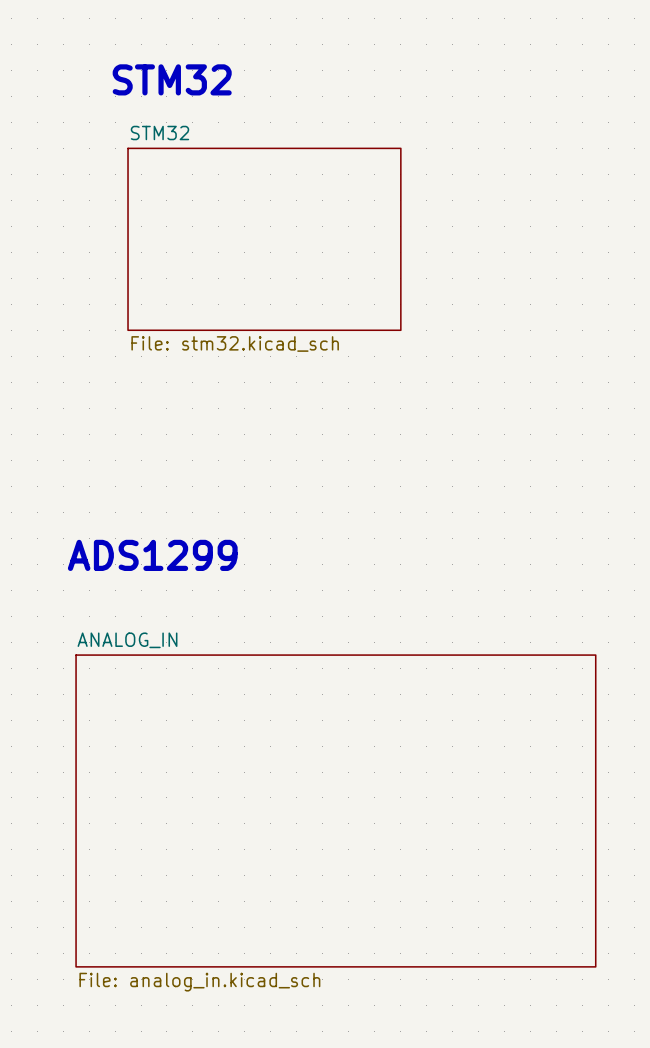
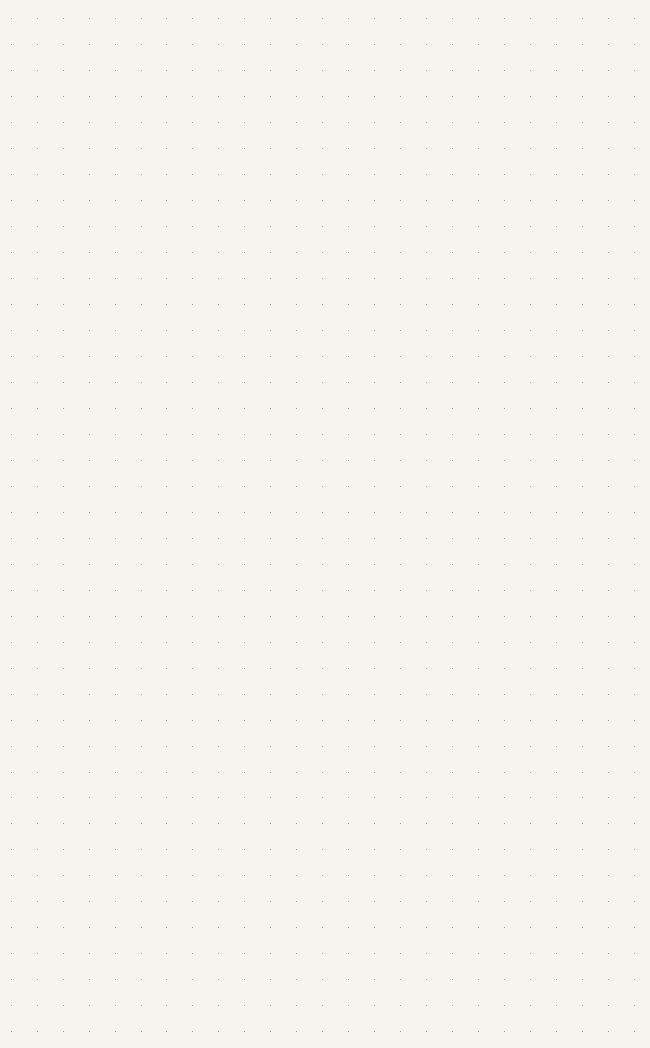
text: STM32 (172, 79) -> none
sheet STM32: File: stm32.kicad_sch (264, 239) -> none
text: ADS1299 (152, 555) -> none
sheet ANALOG_IN: File: analog_in.kicad_sch (335, 810) -> none

